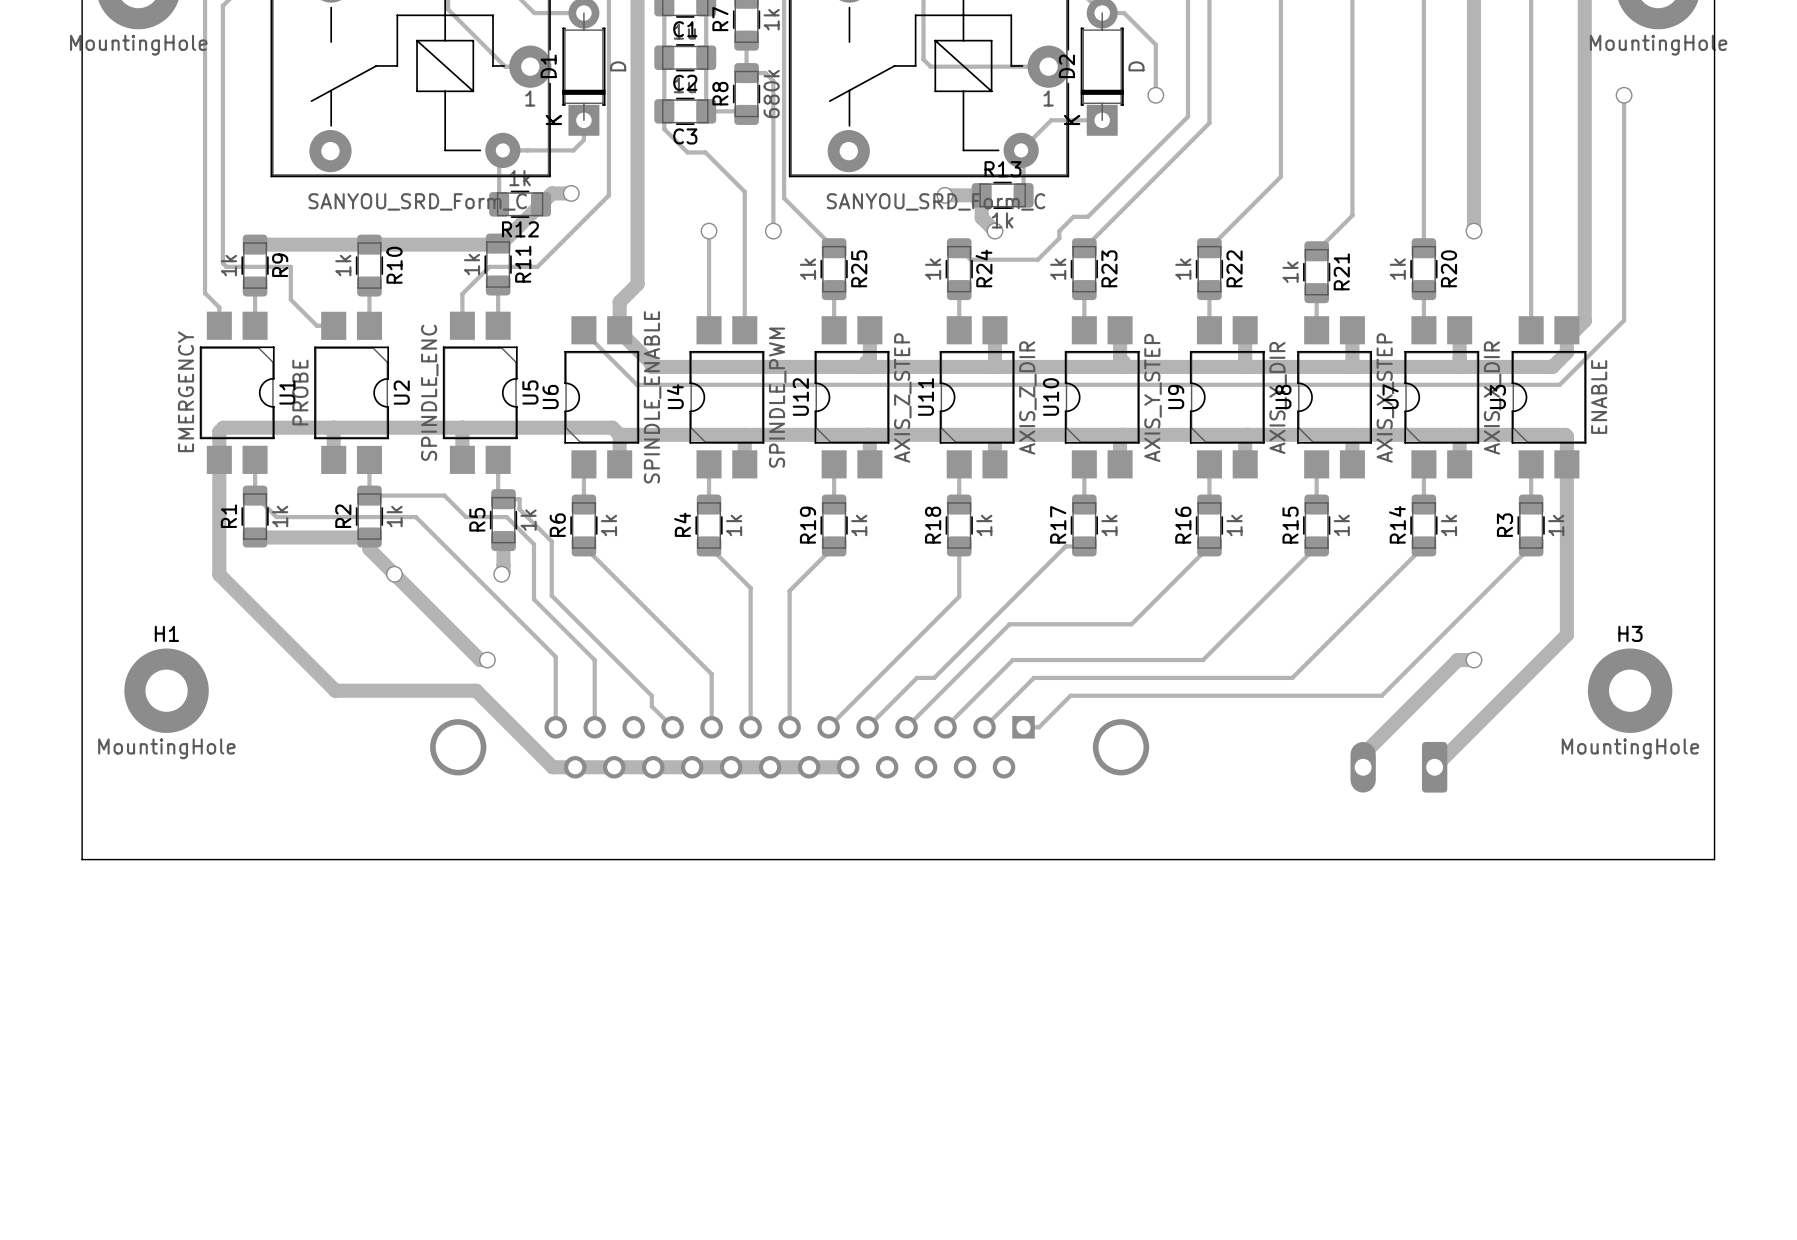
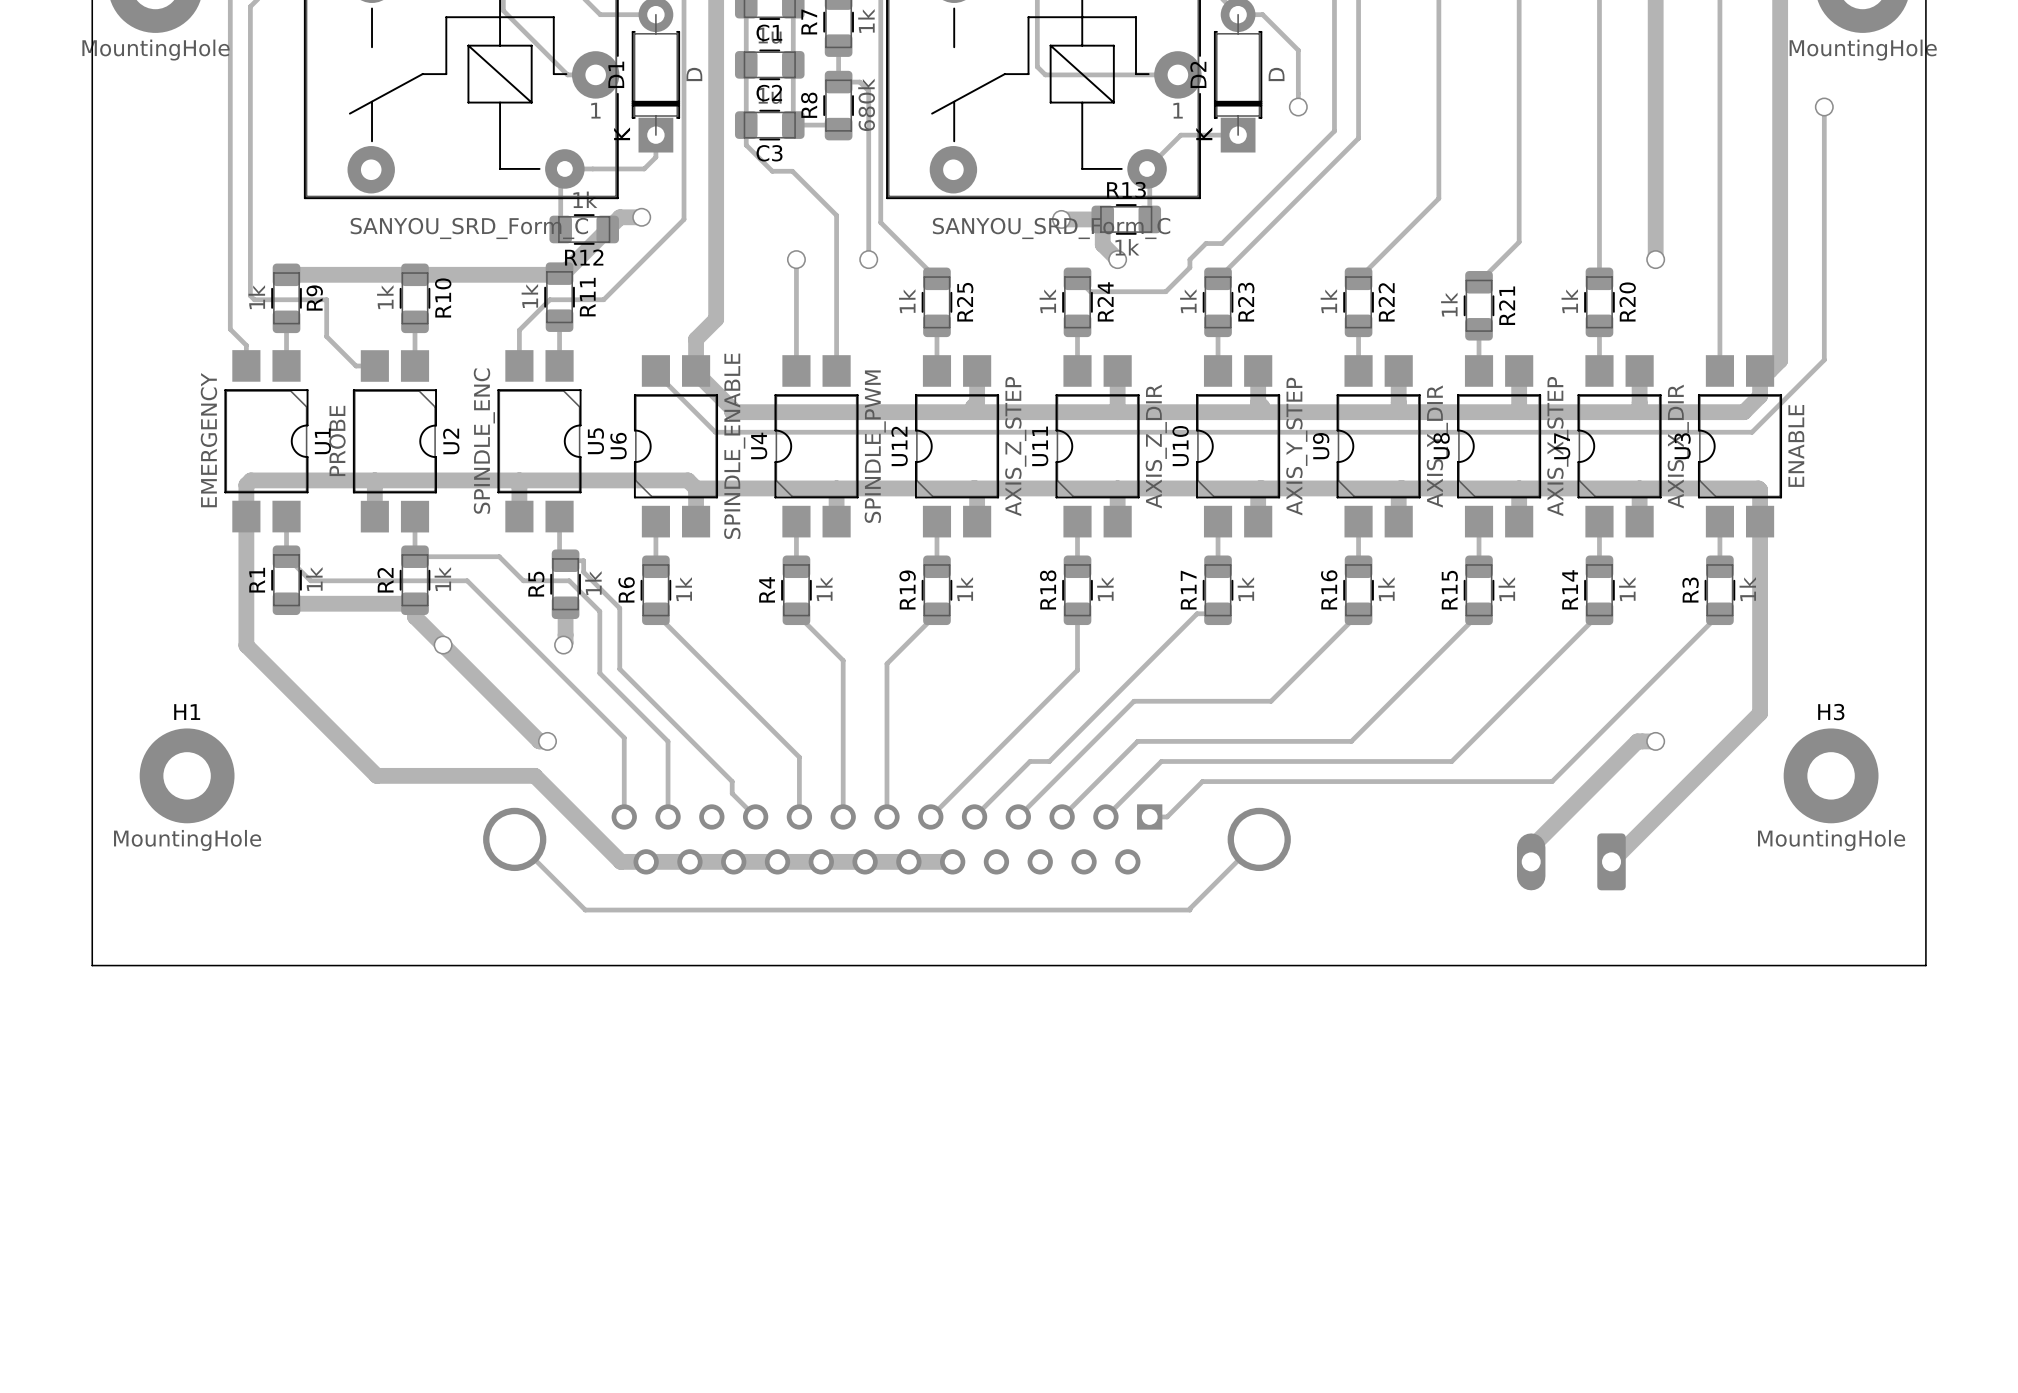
track: none -> (514, 839) (585, 910) (1189, 910) (1259, 839)

